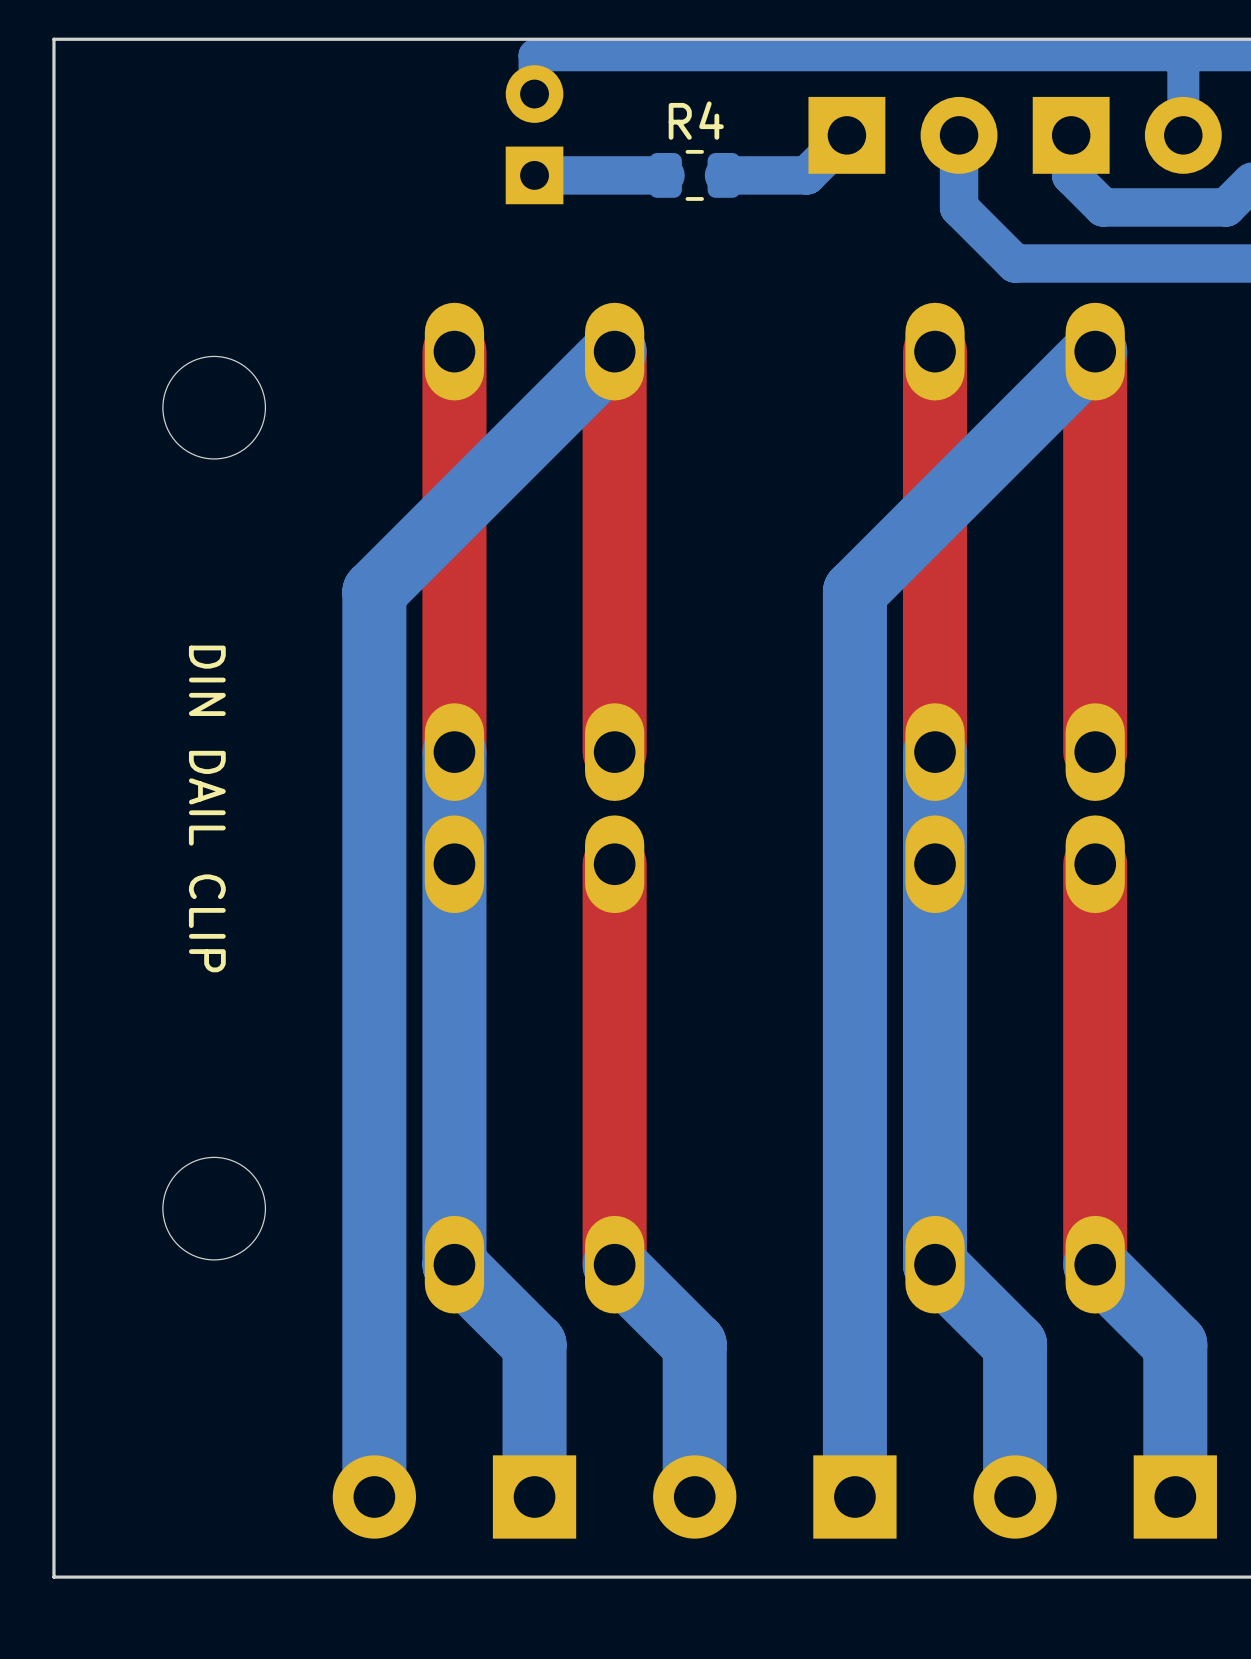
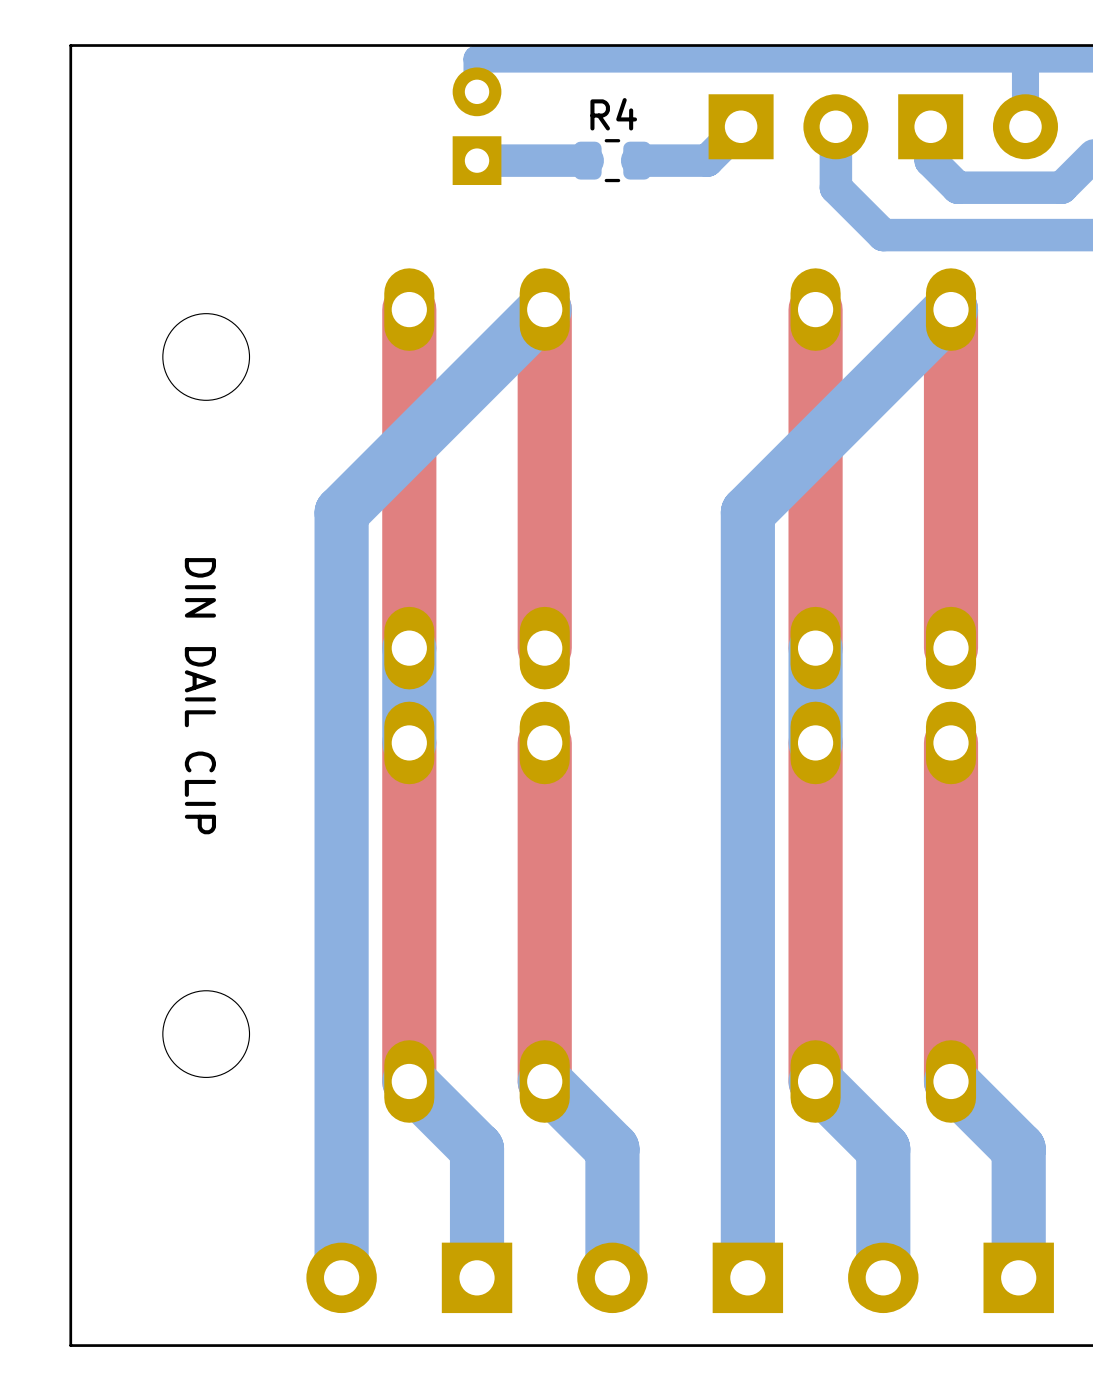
top track: none -> (409, 742) (409, 1081)
bottom track: (454, 864) (454, 1264) -> none
top track: none -> (815, 742) (815, 1081)
bottom track: (935, 864) (935, 1264) -> none

